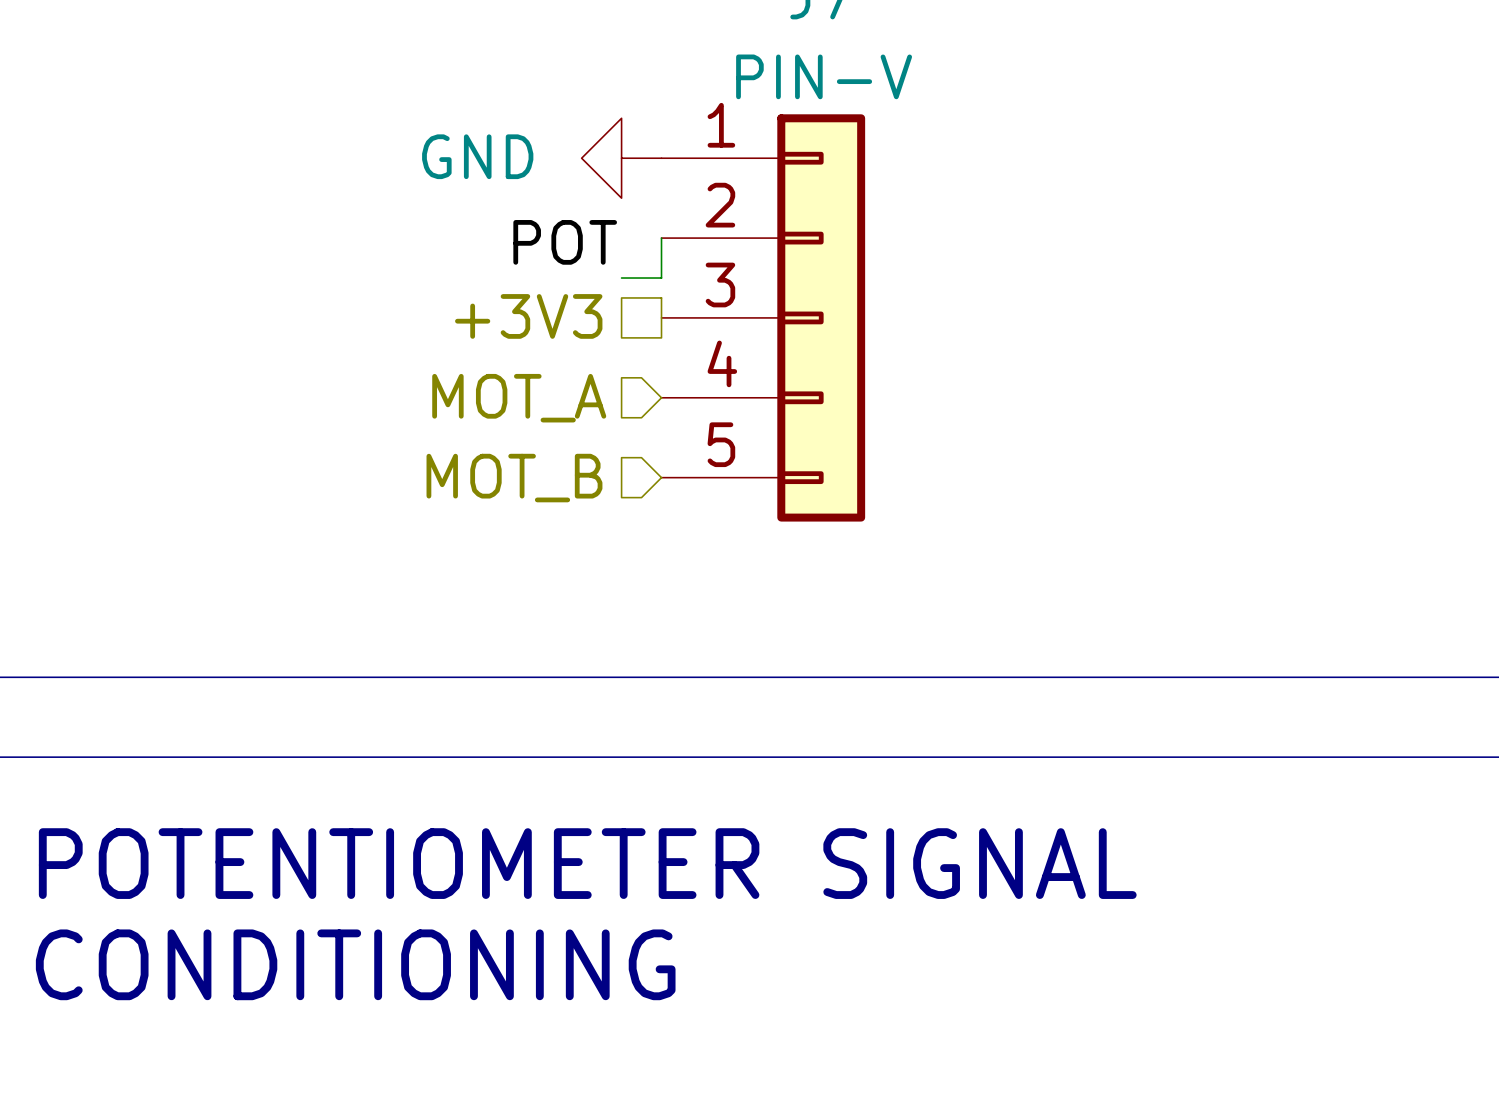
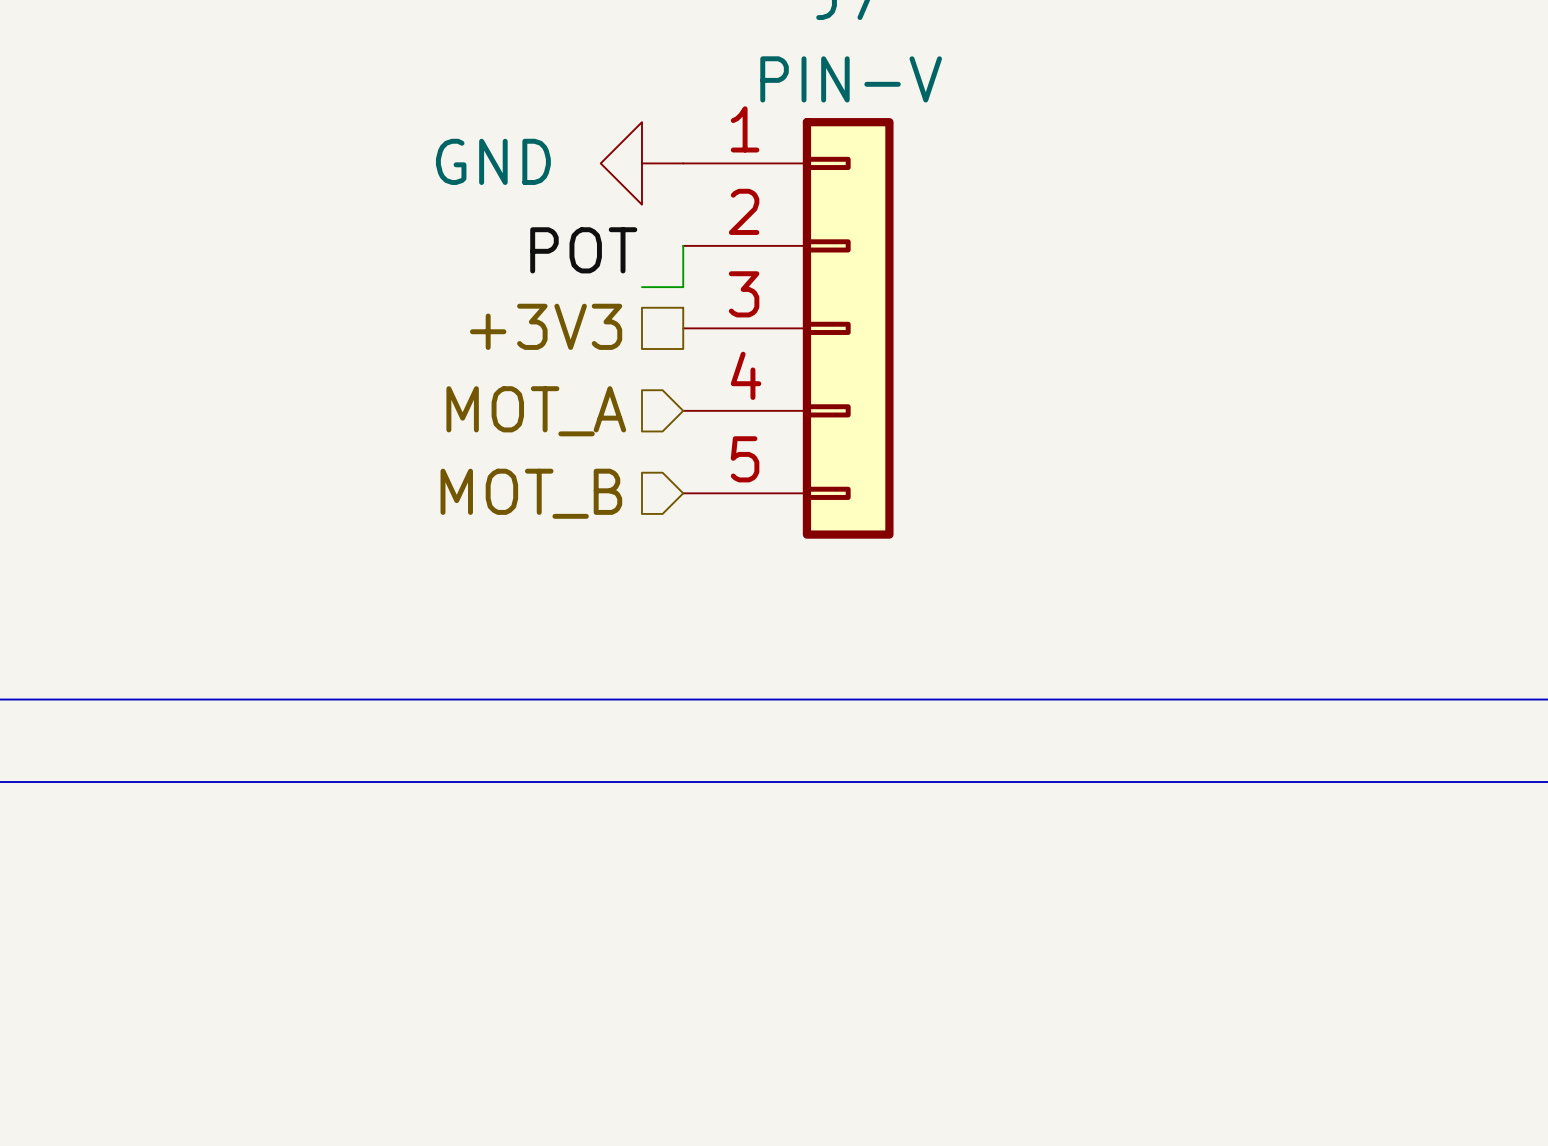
text: POTENTIOMETER SIGNAL (587, 863) -> none
text: CONDITIONING (355, 964) -> none

